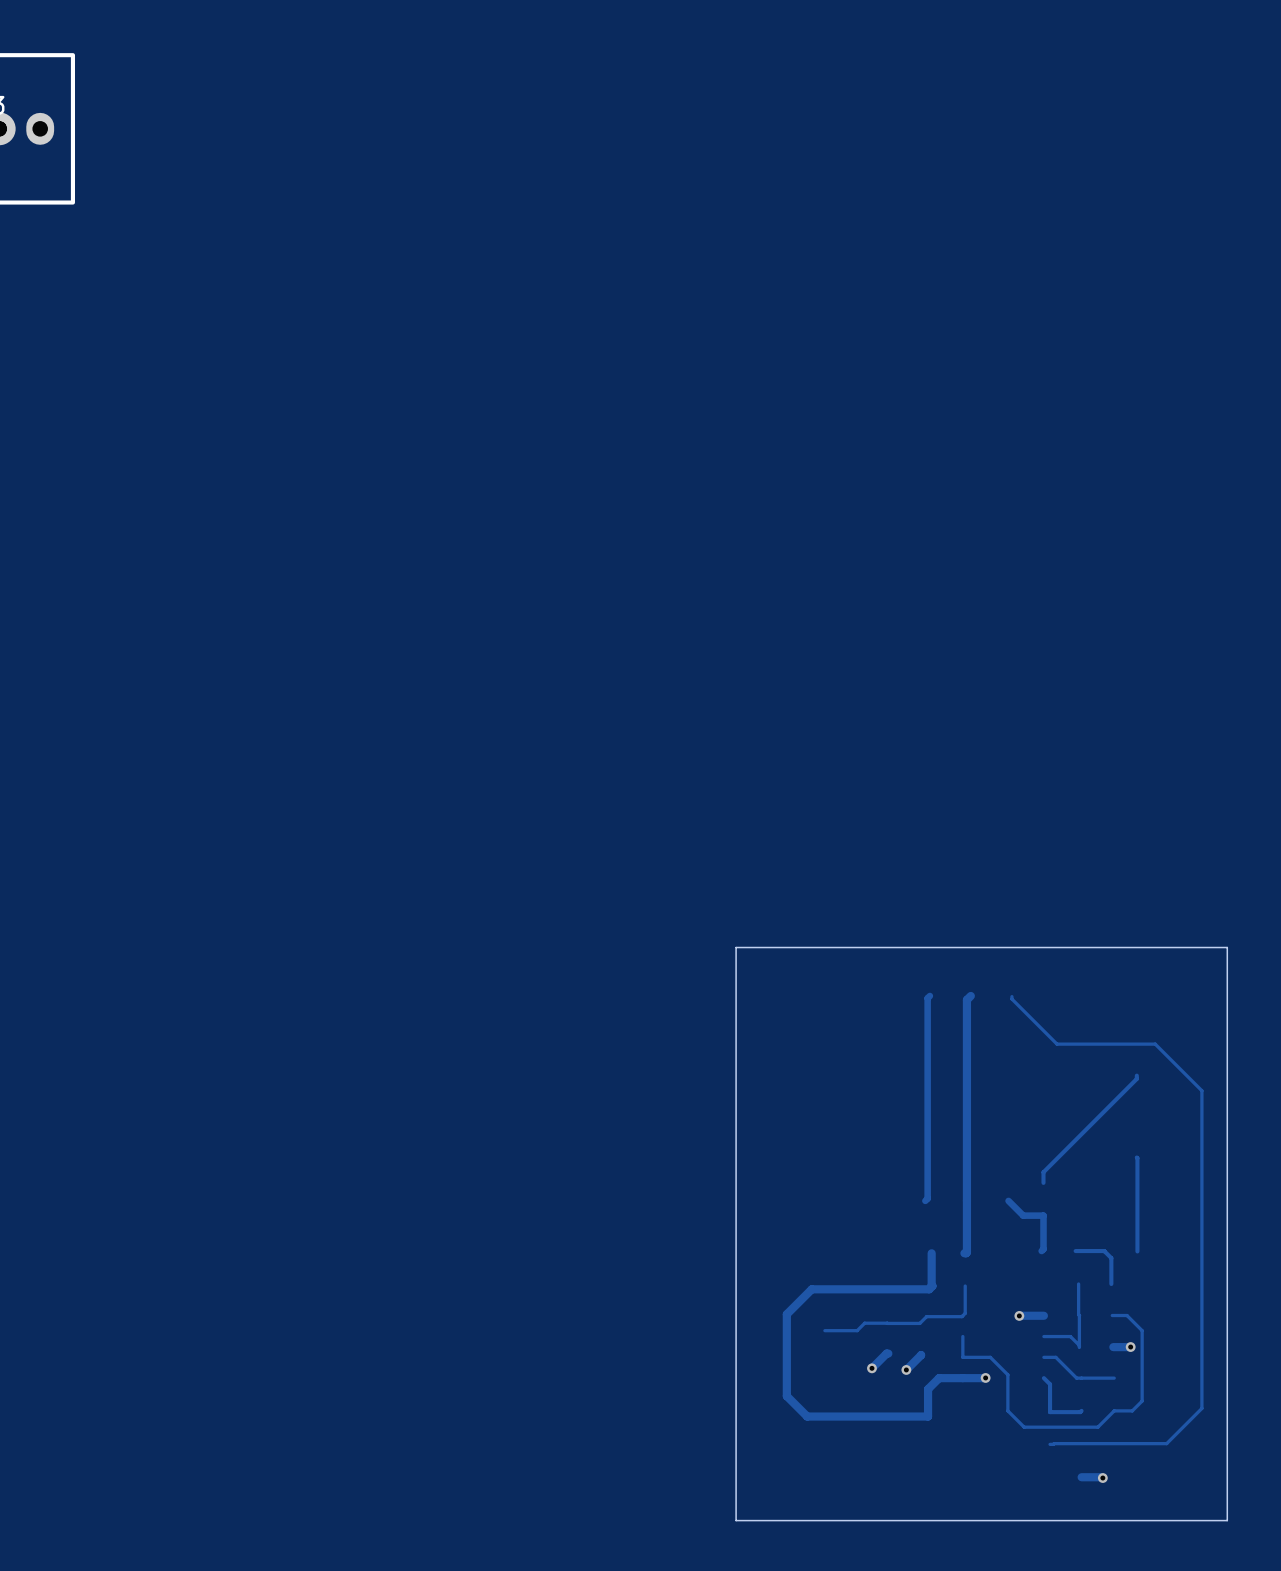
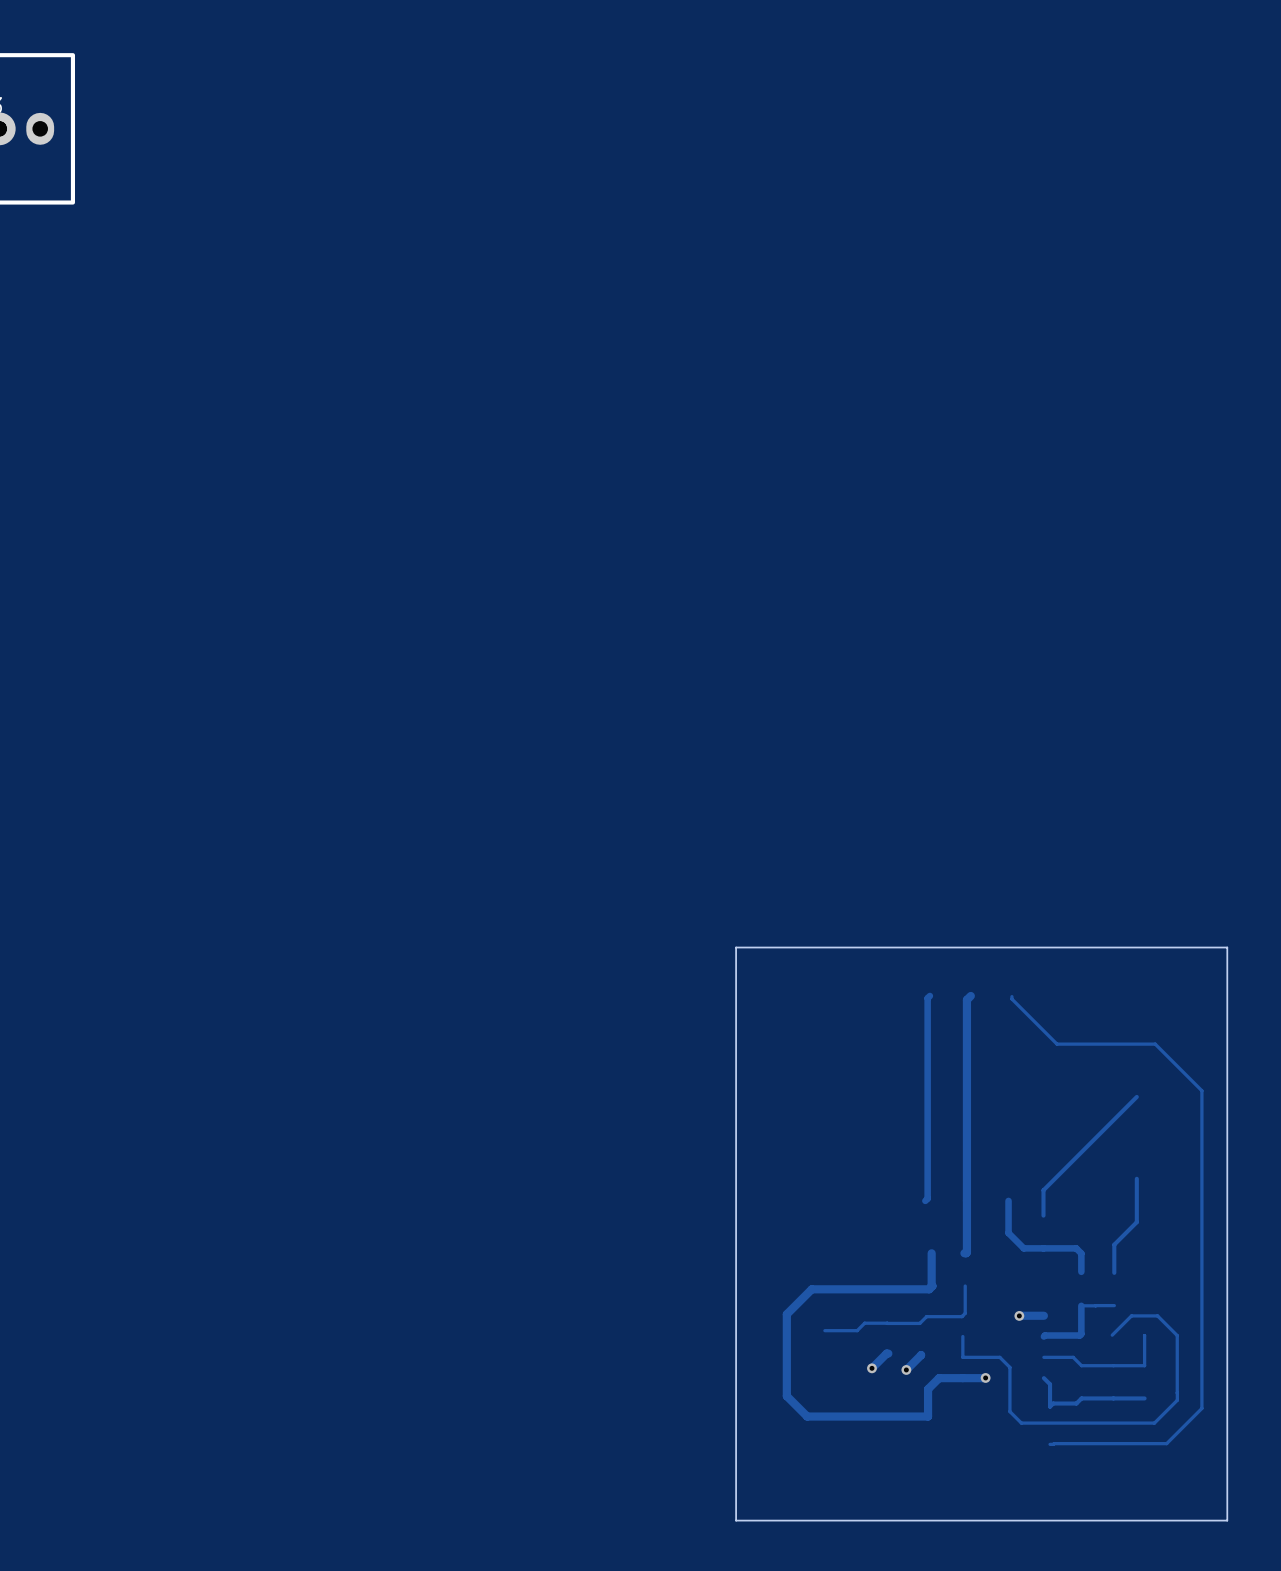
track: (1136, 1075) (1136, 1078) (1043, 1172) (1043, 1182) -> none
track: none -> (1136, 1096) (1043, 1190) (1043, 1215)
track: (1136, 1157) (1137, 1251) -> none
track: none -> (1136, 1178) (1136, 1222) (1114, 1244) (1114, 1272)
track: (1008, 1200) (1023, 1215) (1043, 1215) (1043, 1249) (1041, 1251) -> (1008, 1200) (1008, 1233) (1023, 1248) (1076, 1248) (1081, 1253) (1081, 1271)
track: (1075, 1251) (1104, 1251) (1111, 1258) (1111, 1283) -> none
track: (1078, 1283) (1079, 1315) -> none
track: none -> (1095, 1305) (1114, 1305)
track: (1079, 1315) (1079, 1347) -> none
track: (1112, 1315) (1127, 1315) (1142, 1330) (1142, 1401) (1132, 1410) (1114, 1410) (1097, 1427) (1024, 1427) (1007, 1410) (1007, 1374) (990, 1357) -> (1177, 1392) (1177, 1400) (1154, 1423) (1021, 1423) (1009, 1411) (1009, 1367) (999, 1357) (990, 1357)
track: none -> (1112, 1335) (1131, 1315) (1157, 1315) (1177, 1335) (1177, 1392)
track: (1043, 1336) (1070, 1336) (1079, 1345) -> (1043, 1336) (1079, 1335) (1081, 1305) (1095, 1305)
track: (1113, 1347) (1130, 1347) -> none
via: (1130, 1347) -> none
track: (1055, 1357) (1076, 1378) (1114, 1378) -> (1055, 1357) (1073, 1357) (1081, 1365) (1144, 1365) (1144, 1335)
track: (1050, 1406) (1050, 1412) (1081, 1410) -> (1050, 1406) (1053, 1403) (1076, 1403) (1081, 1398) (1144, 1398)
track: (1081, 1477) (1102, 1478) -> none
via: (1102, 1478) -> none

